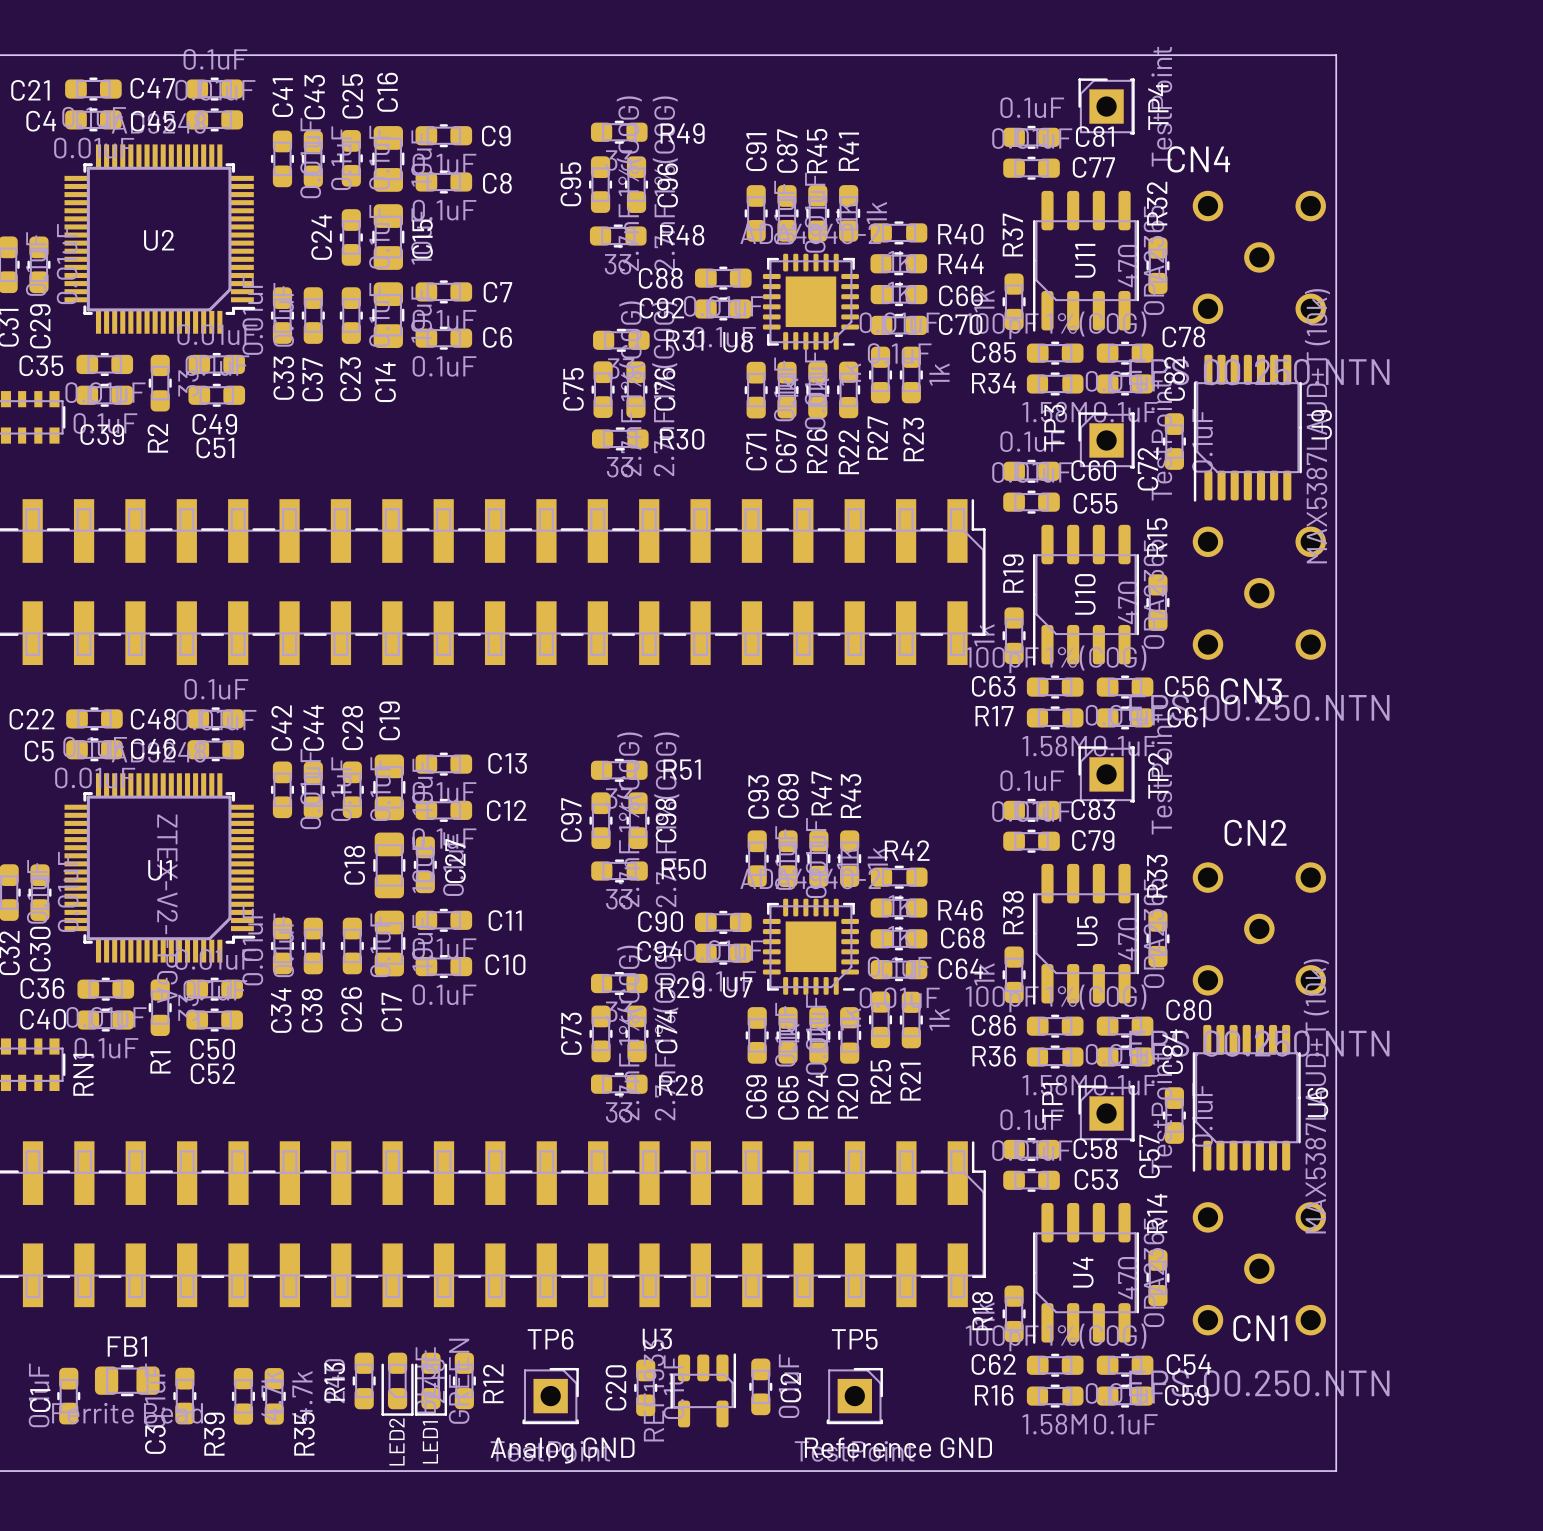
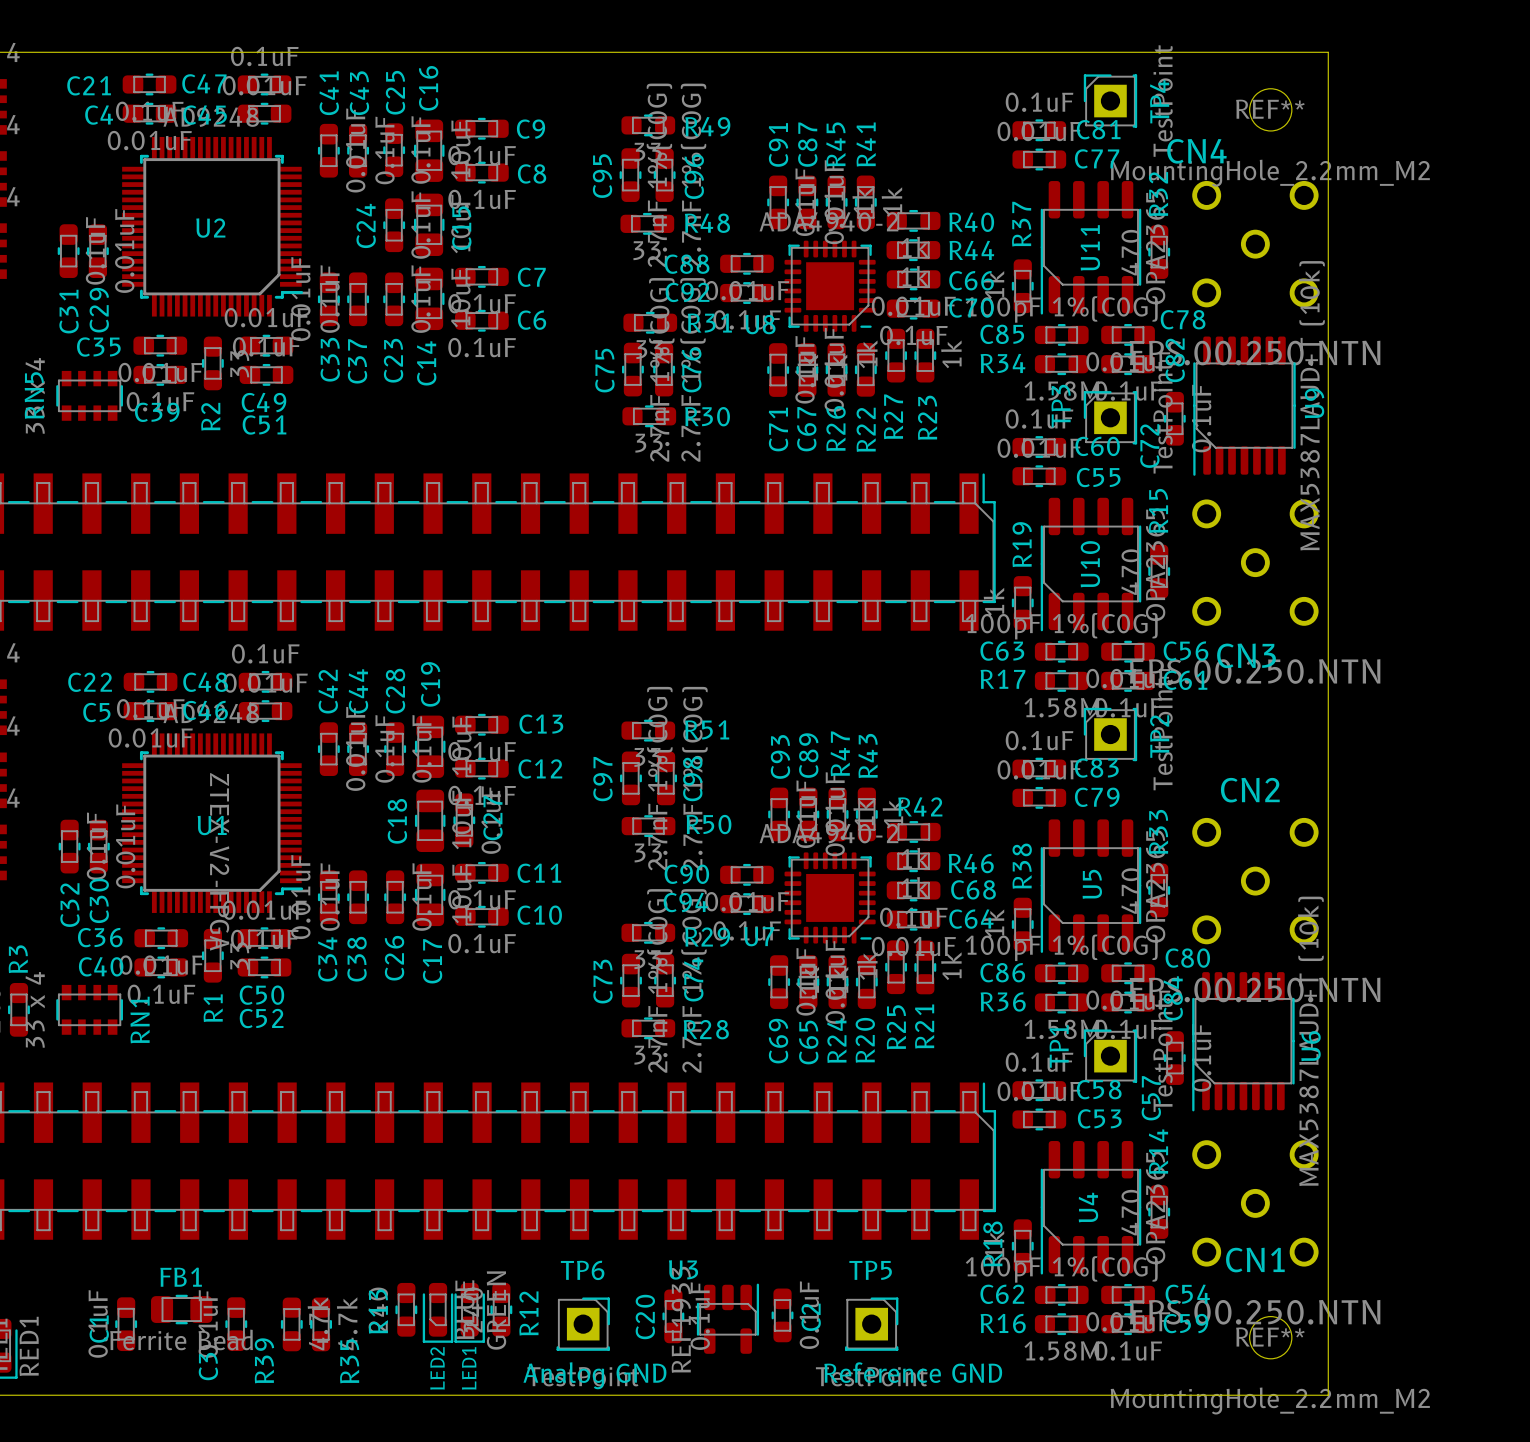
REF**: none -> MountingHole_2.2mm_M2 (1270, 109)
REF**: none -> MountingHole_2.2mm_M2 (1270, 1337)

